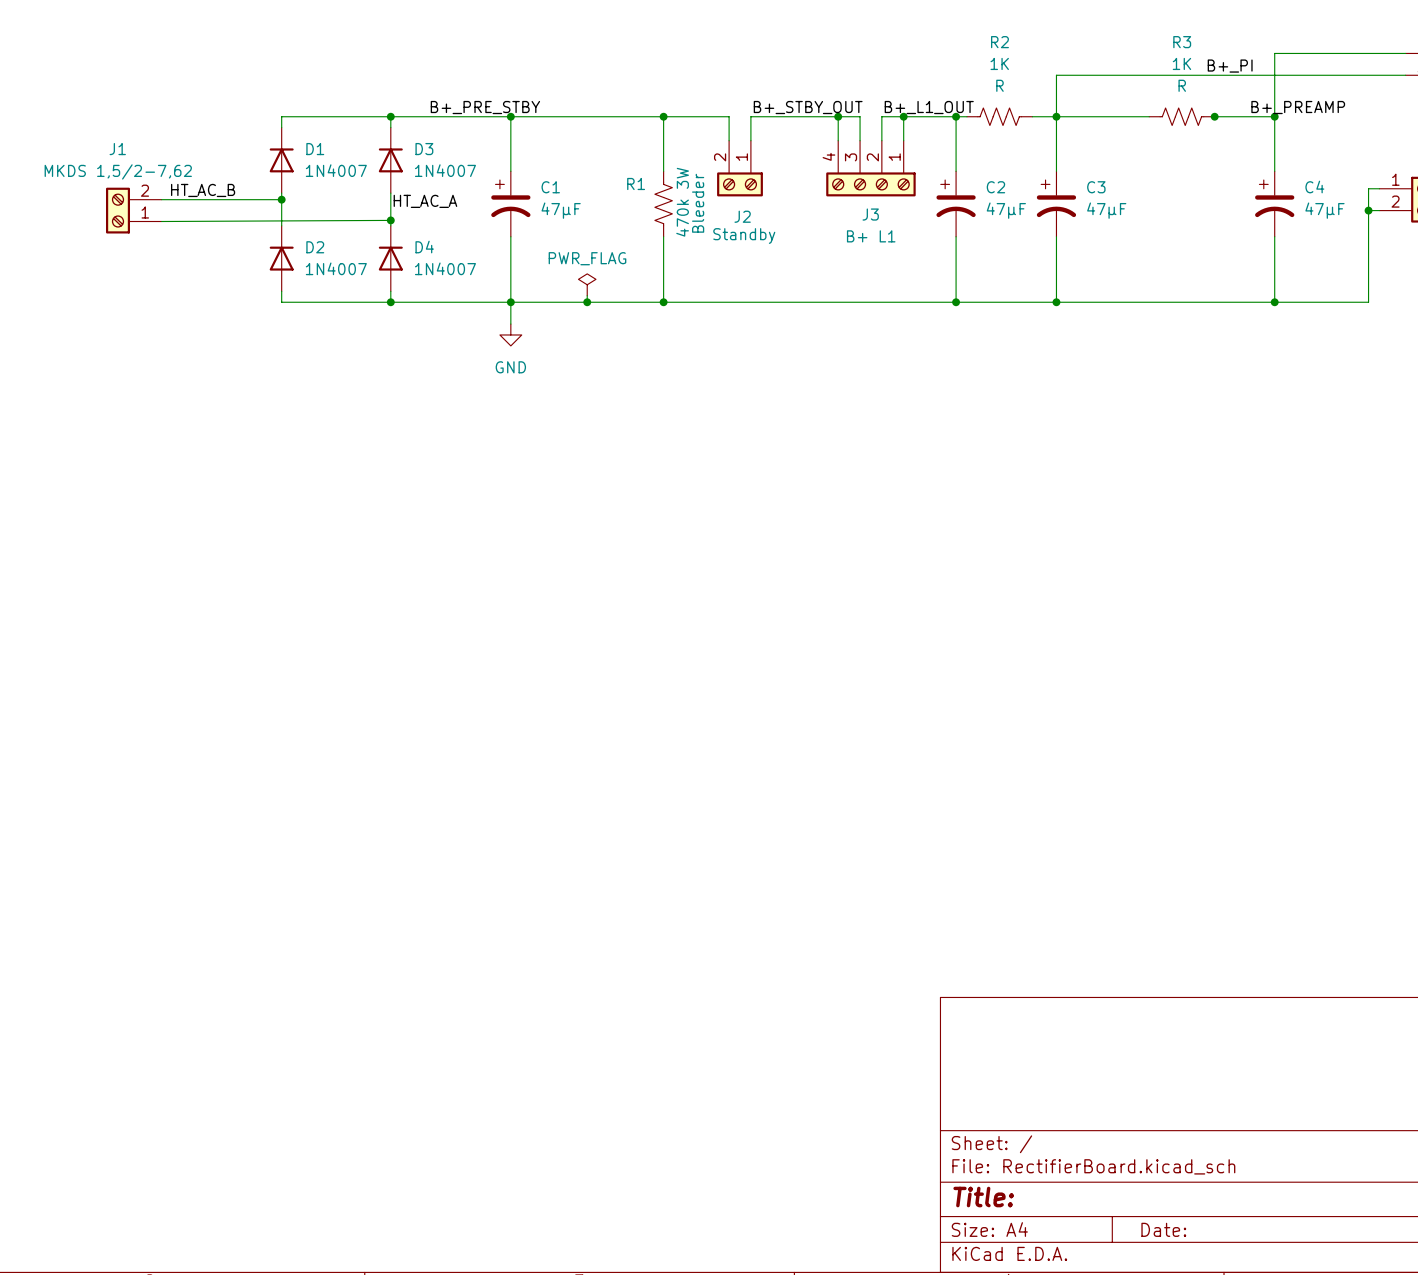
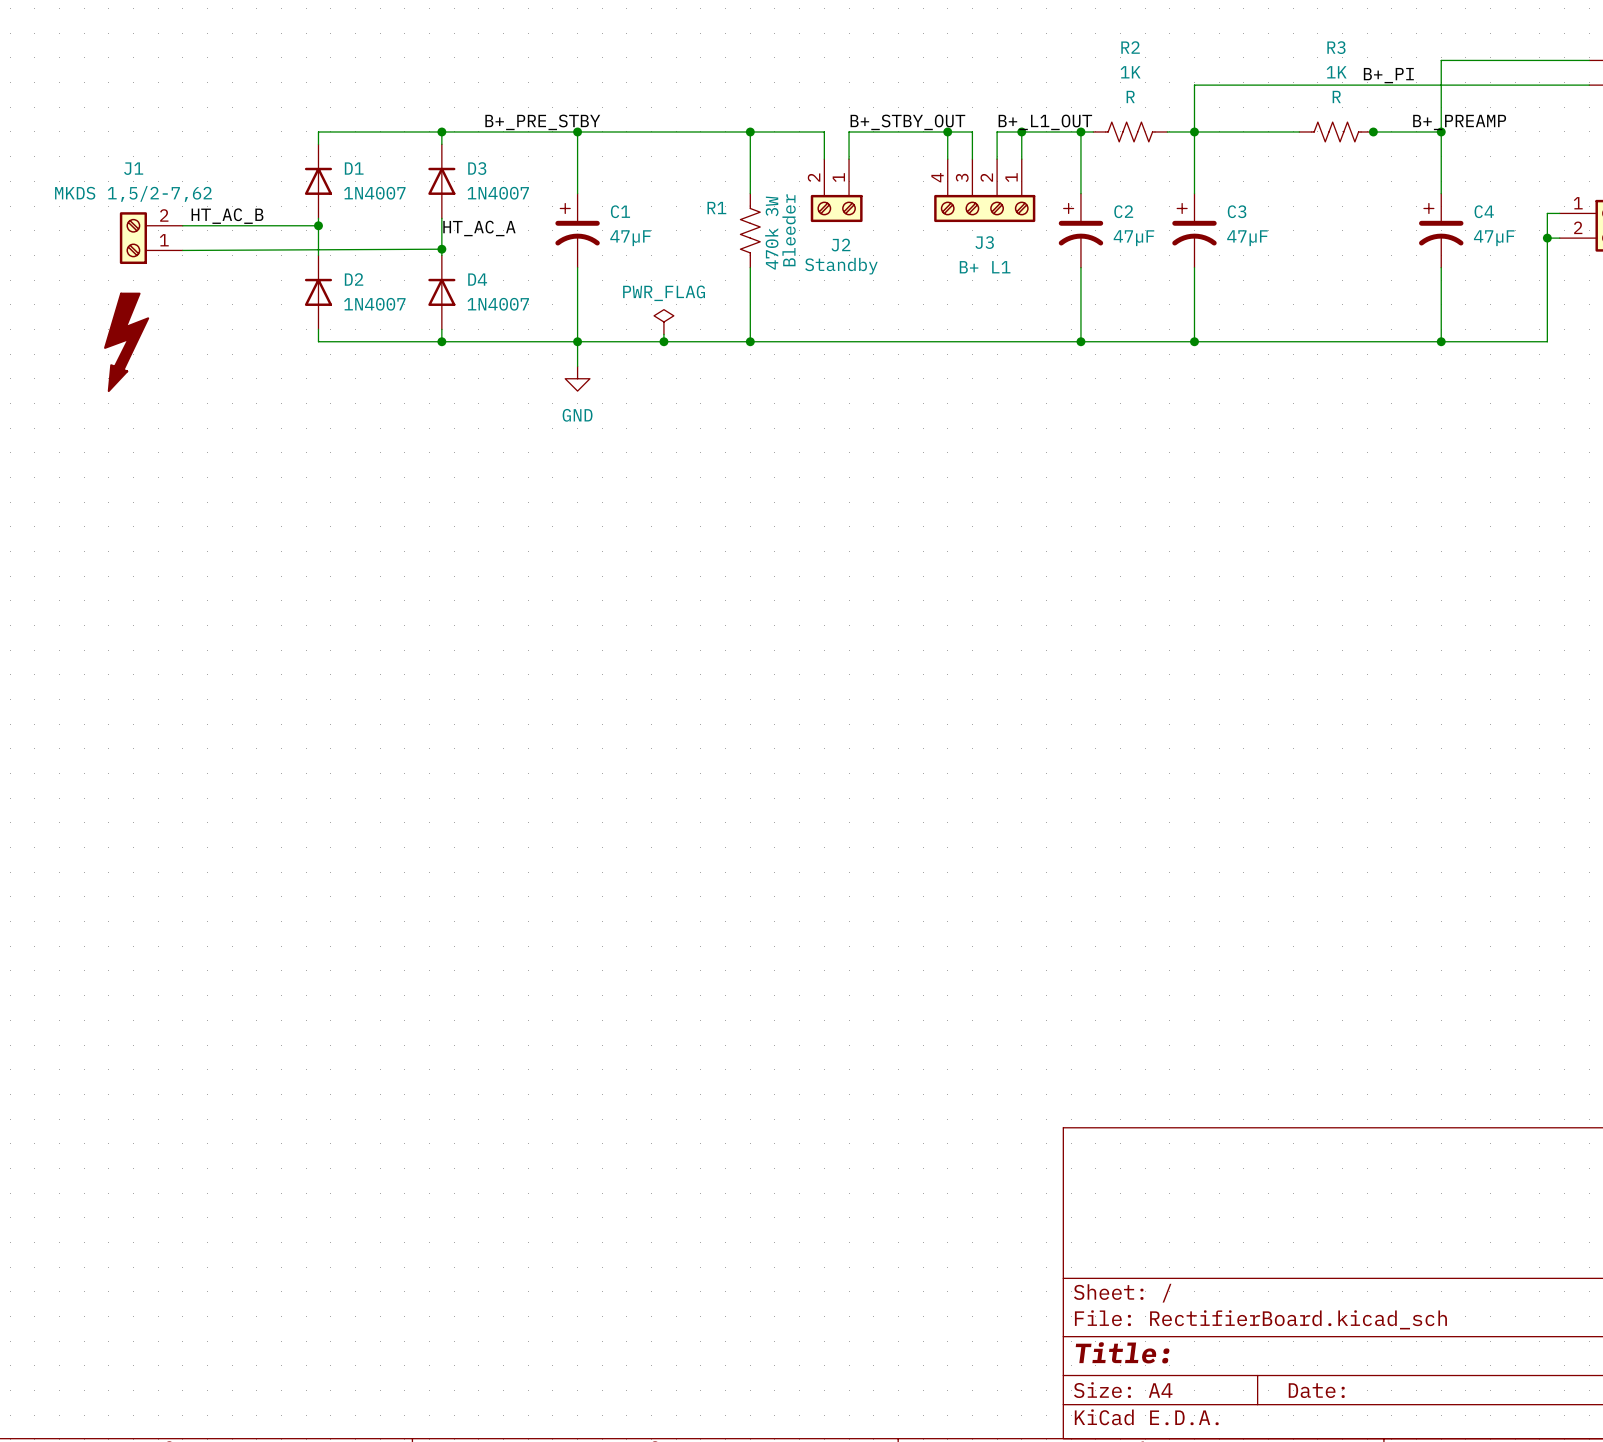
power symbol: none -> (126, 342)

